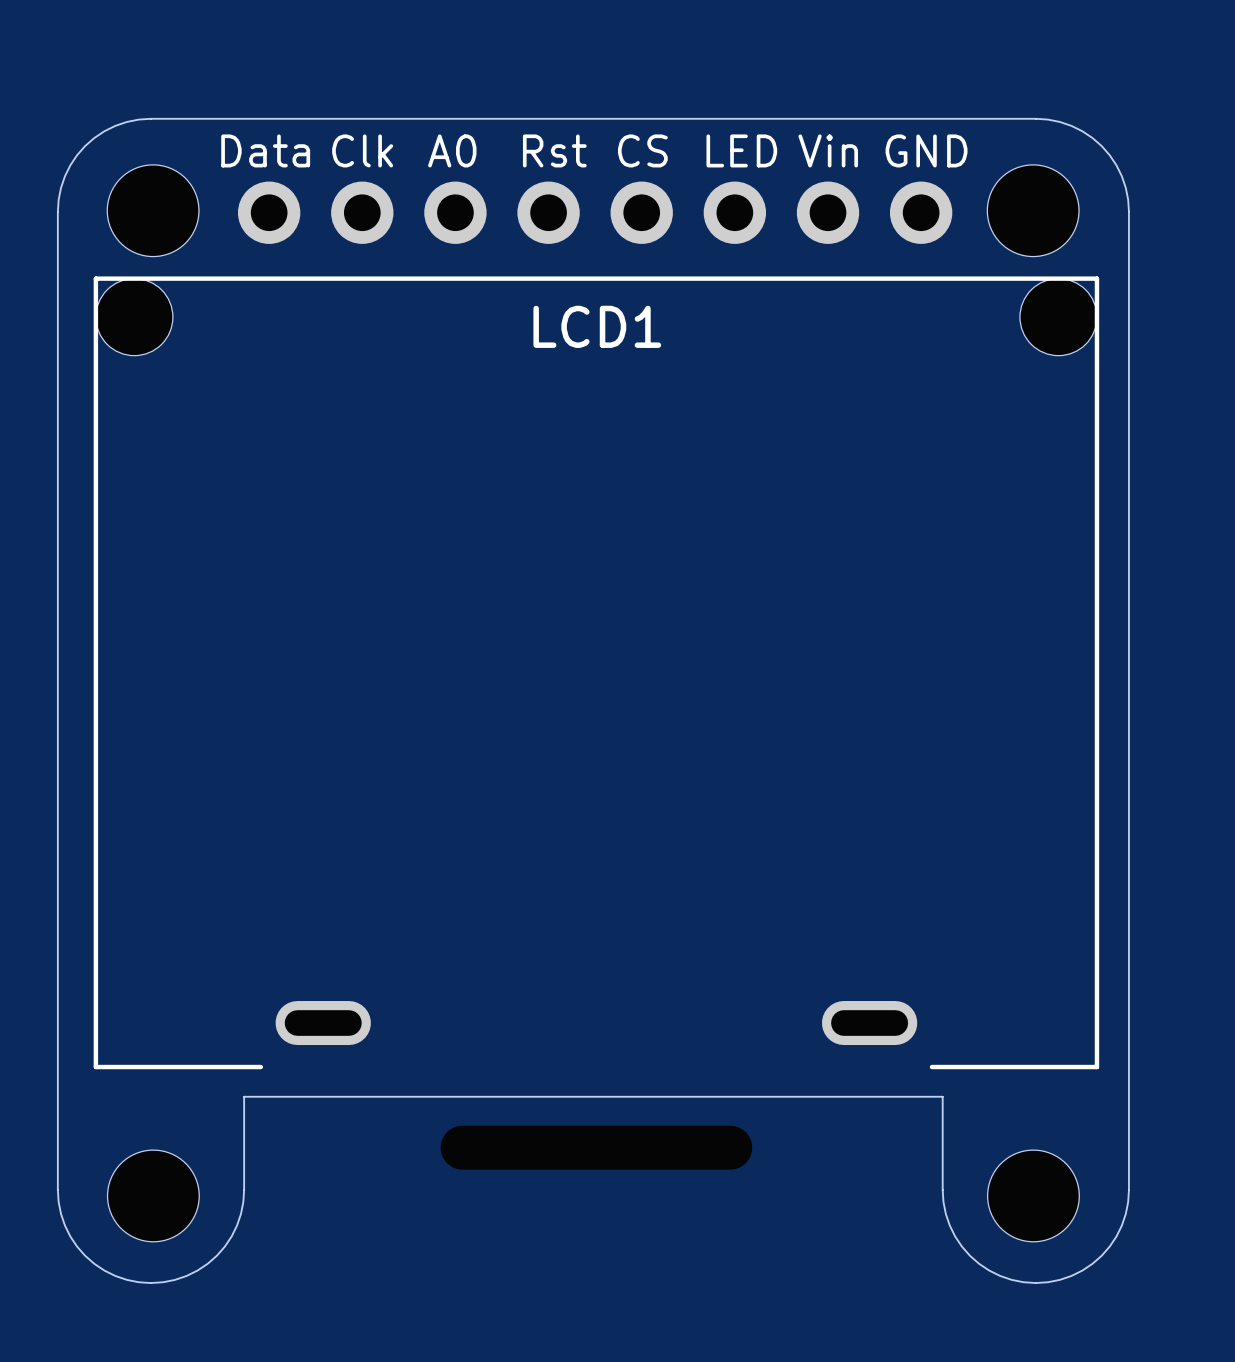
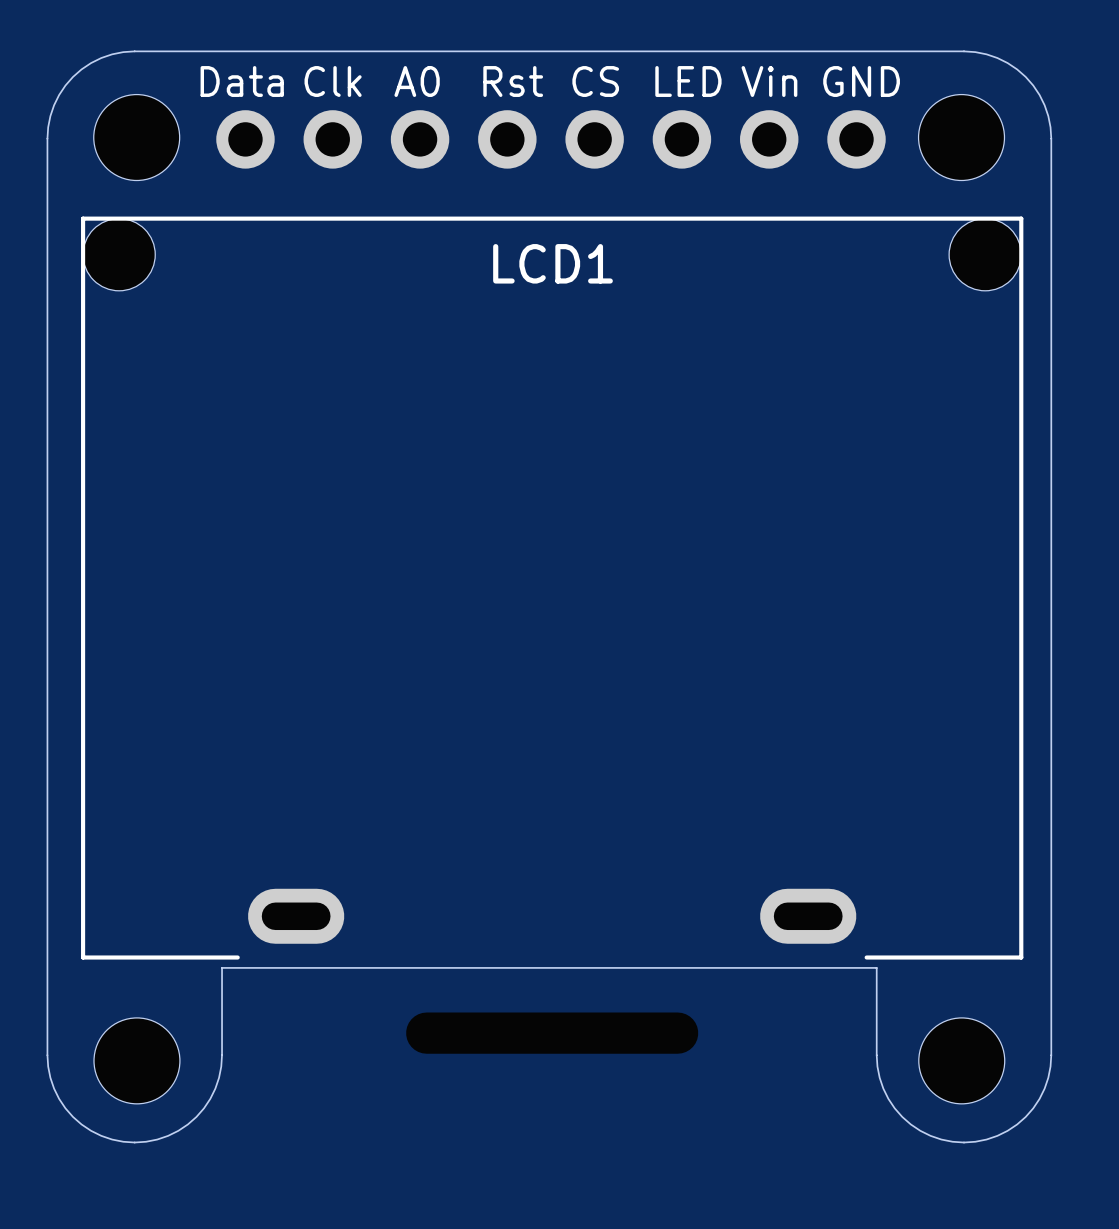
LCD1 footprint: [93, 276, 1100, 1170] -> [81, 216, 1024, 1054]
LCD1 name position: LCD1 (597, 326) -> LCD1 (553, 263)

